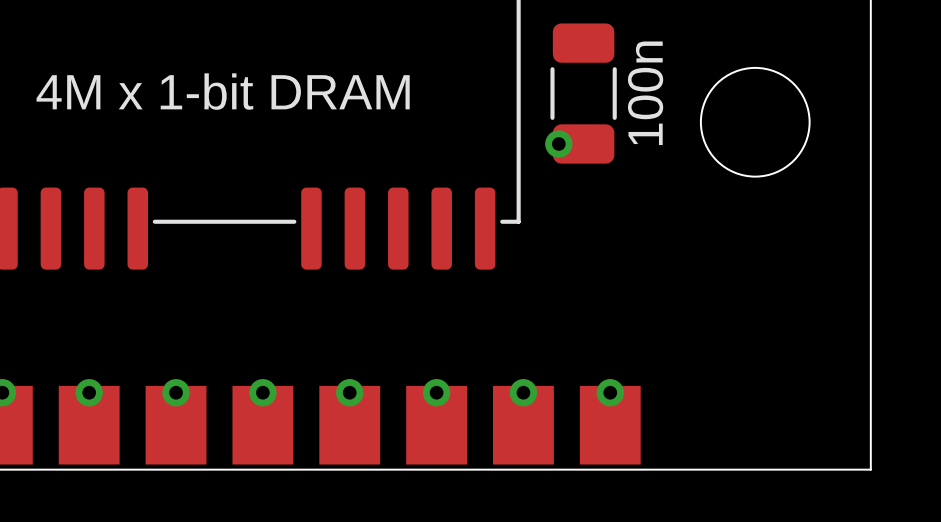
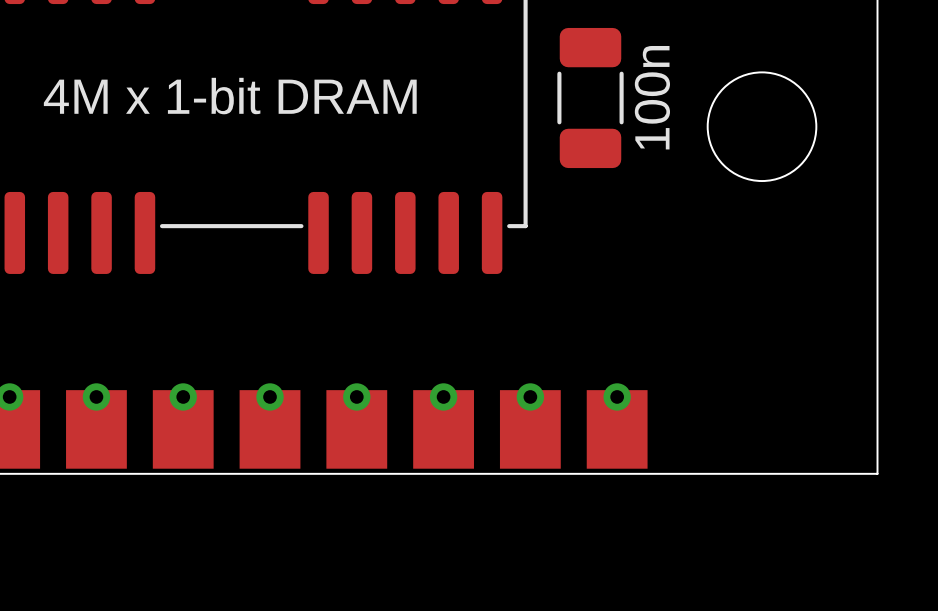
via: (558, 143) -> none

